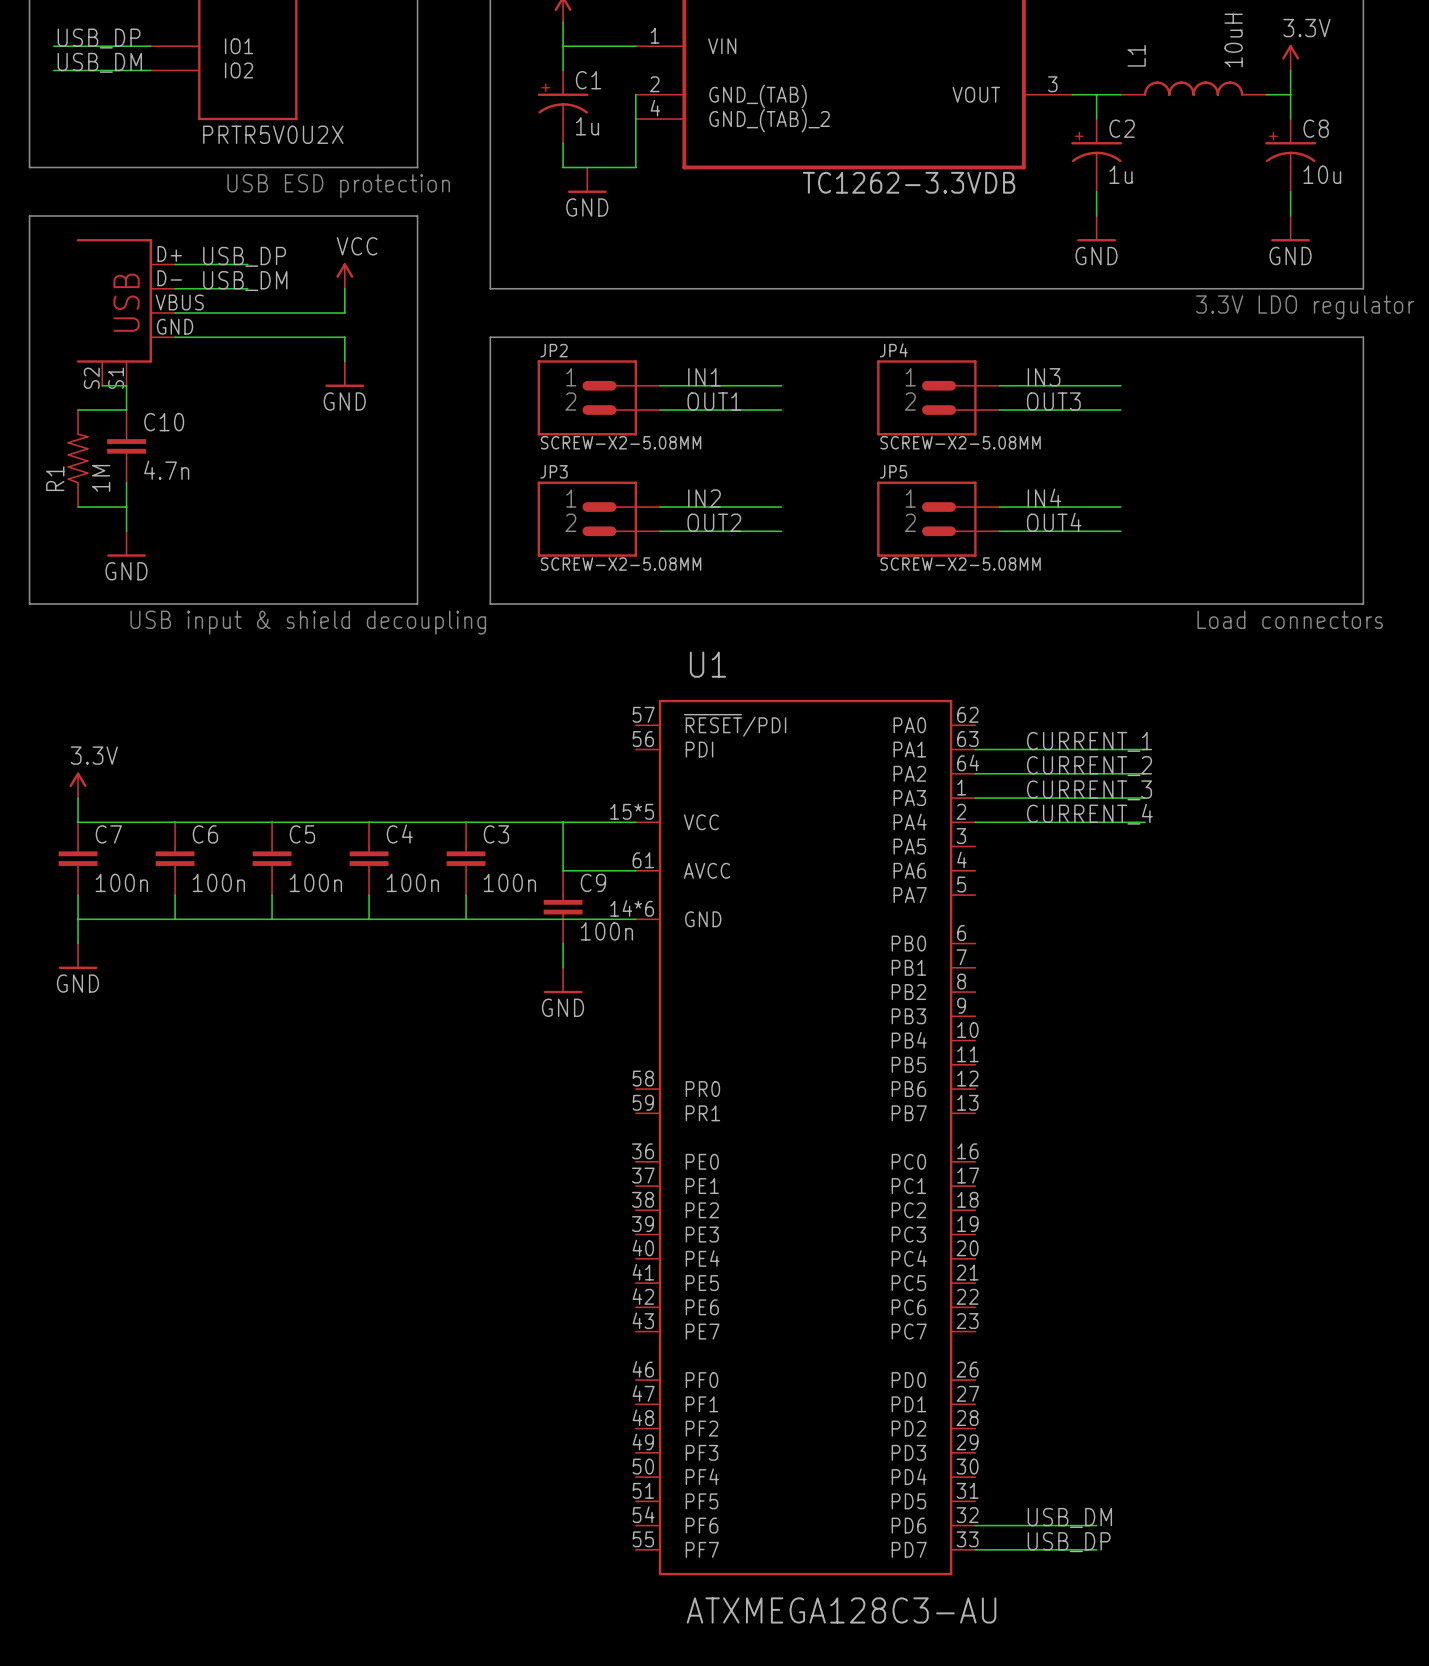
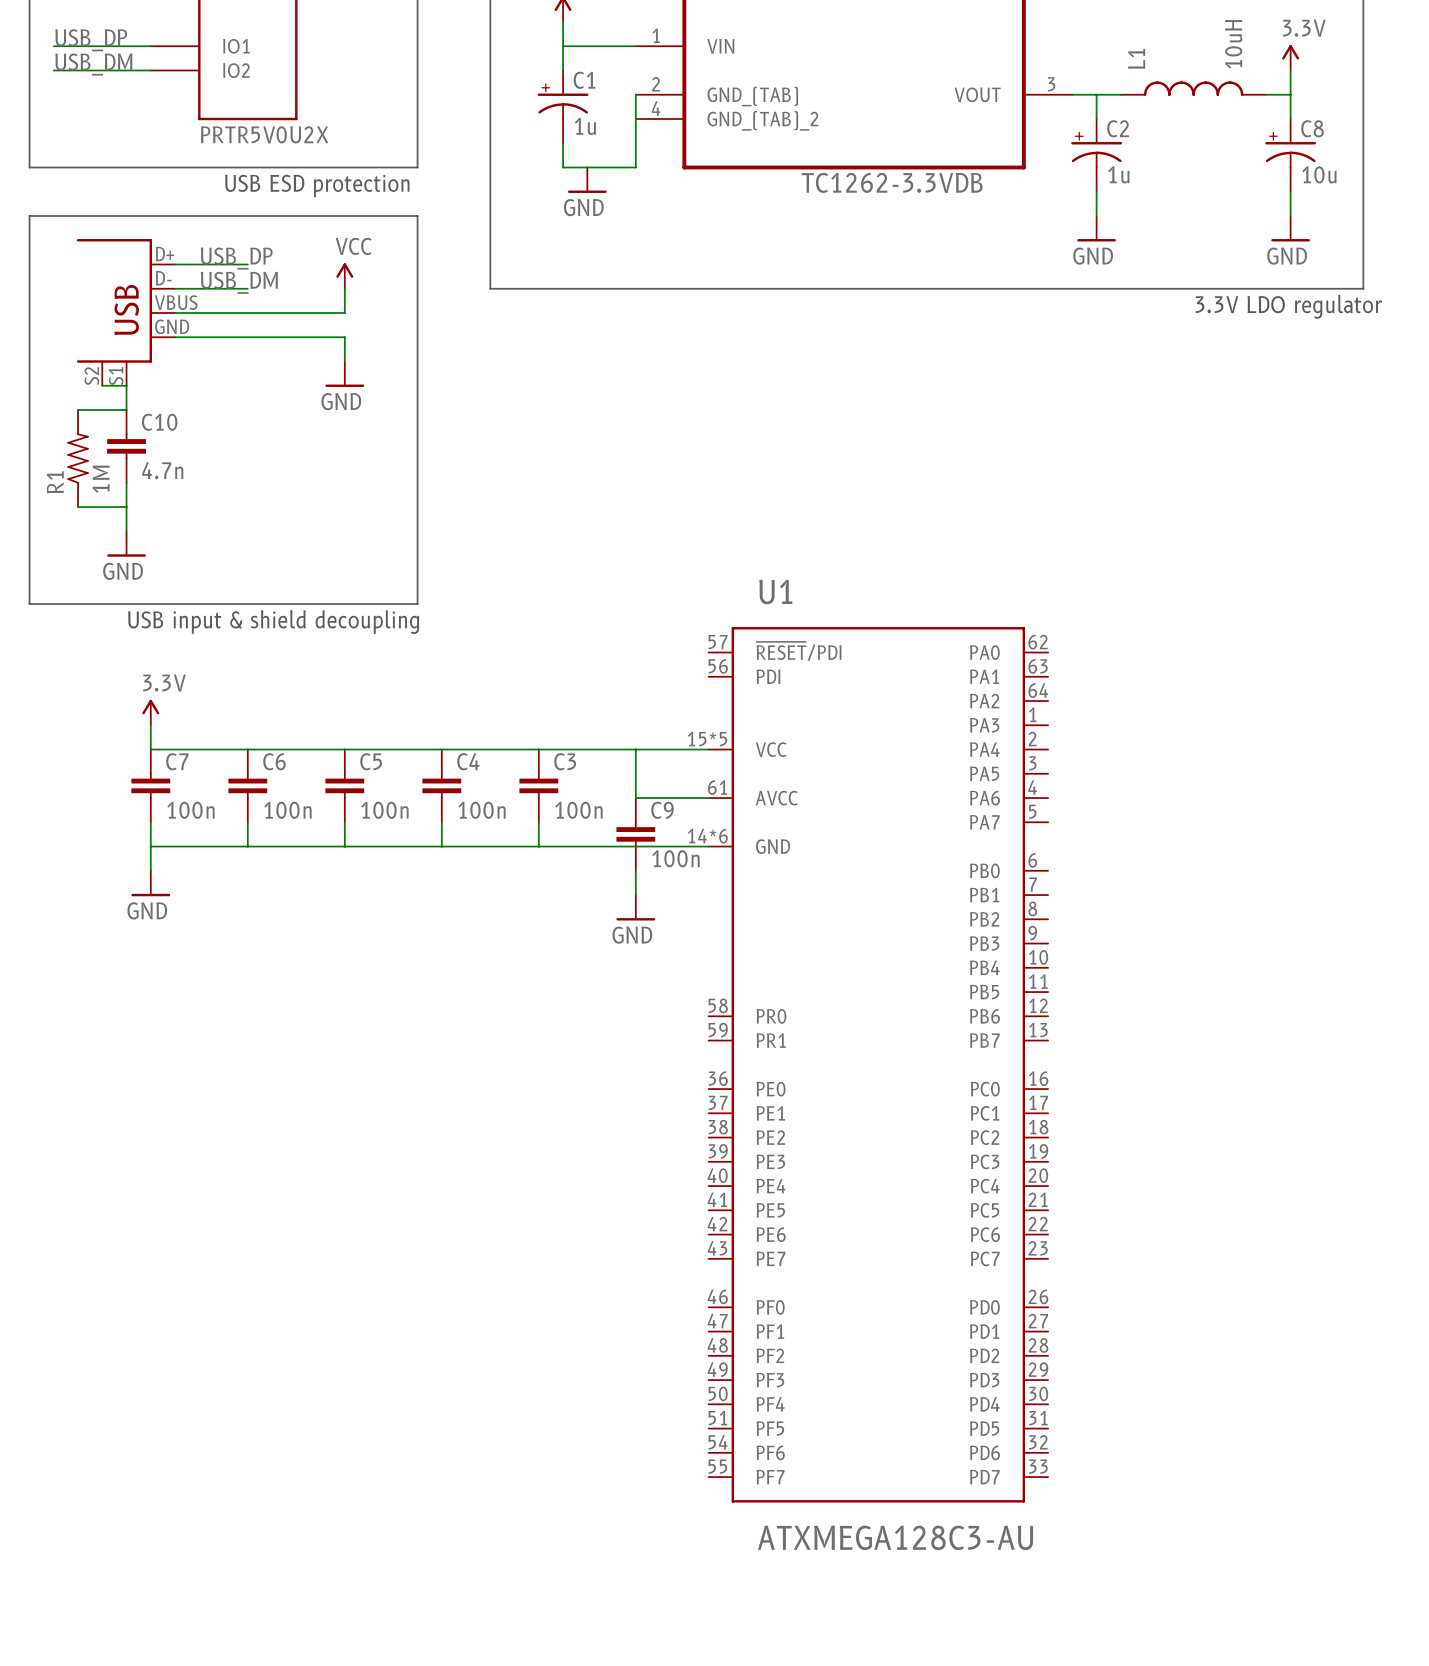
line: (490, 337) (490, 604) (1363, 604) (1363, 337) (490, 337) -> none
label: IN1 (704, 377) -> none
label: IN3 (1044, 377) -> none
wire: (660, 385) (781, 385) -> none
wire: (999, 385) (1120, 385) -> none
JP2: SCREW-X2-5.08MM (598, 397) -> none
JP4: SCREW-X2-5.08MM (938, 397) -> none
label: OUT1 (714, 401) -> none
label: OUT3 (1053, 401) -> none
wire: (660, 410) (781, 410) -> none
wire: (999, 410) (1120, 410) -> none
label: IN2 (704, 498) -> none
label: IN4 (1044, 498) -> none
wire: (660, 507) (781, 507) -> none
wire: (999, 507) (1120, 507) -> none
JP3: SCREW-X2-5.08MM (598, 519) -> none
JP5: SCREW-X2-5.08MM (938, 519) -> none
label: OUT2 (714, 522) -> none
label: OUT4 (1054, 522) -> none
wire: (660, 531) (781, 531) -> none
wire: (999, 531) (1120, 531) -> none
text: Load connectors (1290, 619) -> none
label: CURRENT_1 (1089, 741) -> none
wire: none -> (635, 749) (635, 798) (708, 798)
wire: (975, 749) (1145, 749) -> none
label: CURRENT_2 (1089, 766) -> none
wire: (975, 773) (1145, 773) -> none
power symbol position: 3.3V (78, 785) -> 3.3V (150, 712)
label: CURRENT_3 (1089, 790) -> none
wire: (78, 798) (78, 822) (635, 822) -> (150, 725) (150, 749) (708, 749)
wire: (975, 798) (1145, 798) -> none
label: CURRENT_4 (1089, 814) -> none
wire: (563, 822) (563, 870) (635, 870) -> (635, 895) (635, 870)
wire: (975, 822) (1145, 822) -> none
C7 position: (78, 858) -> (150, 785)
C6 position: (175, 858) -> (247, 785)
C5 position: (272, 858) -> (344, 785)
C4 position: (369, 858) -> (441, 785)
C3 position: (466, 858) -> (538, 785)
wire: (78, 895) (78, 943) -> (150, 822) (150, 870)
wire: (175, 895) (175, 919) -> (247, 822) (247, 846)
wire: (272, 895) (272, 919) -> (344, 822) (344, 846)
wire: (369, 895) (369, 919) -> (441, 822) (441, 846)
wire: (466, 895) (466, 919) -> (538, 822) (538, 846)
C9 position: (563, 907) -> (635, 834)
wire: (78, 919) (635, 919) -> (150, 846) (708, 846)
wire: (563, 943) (563, 967) -> none
power symbol position: GND (78, 956) -> GND (150, 883)
power symbol position: GND (563, 980) -> GND (635, 907)
U1 position: (805, 1137) -> (878, 1064)
label: USB_DM (1069, 1517) -> none
wire: (975, 1525) (1096, 1525) -> none
label: USB_DP (1069, 1542) -> none
wire: (975, 1549) (1096, 1549) -> none

